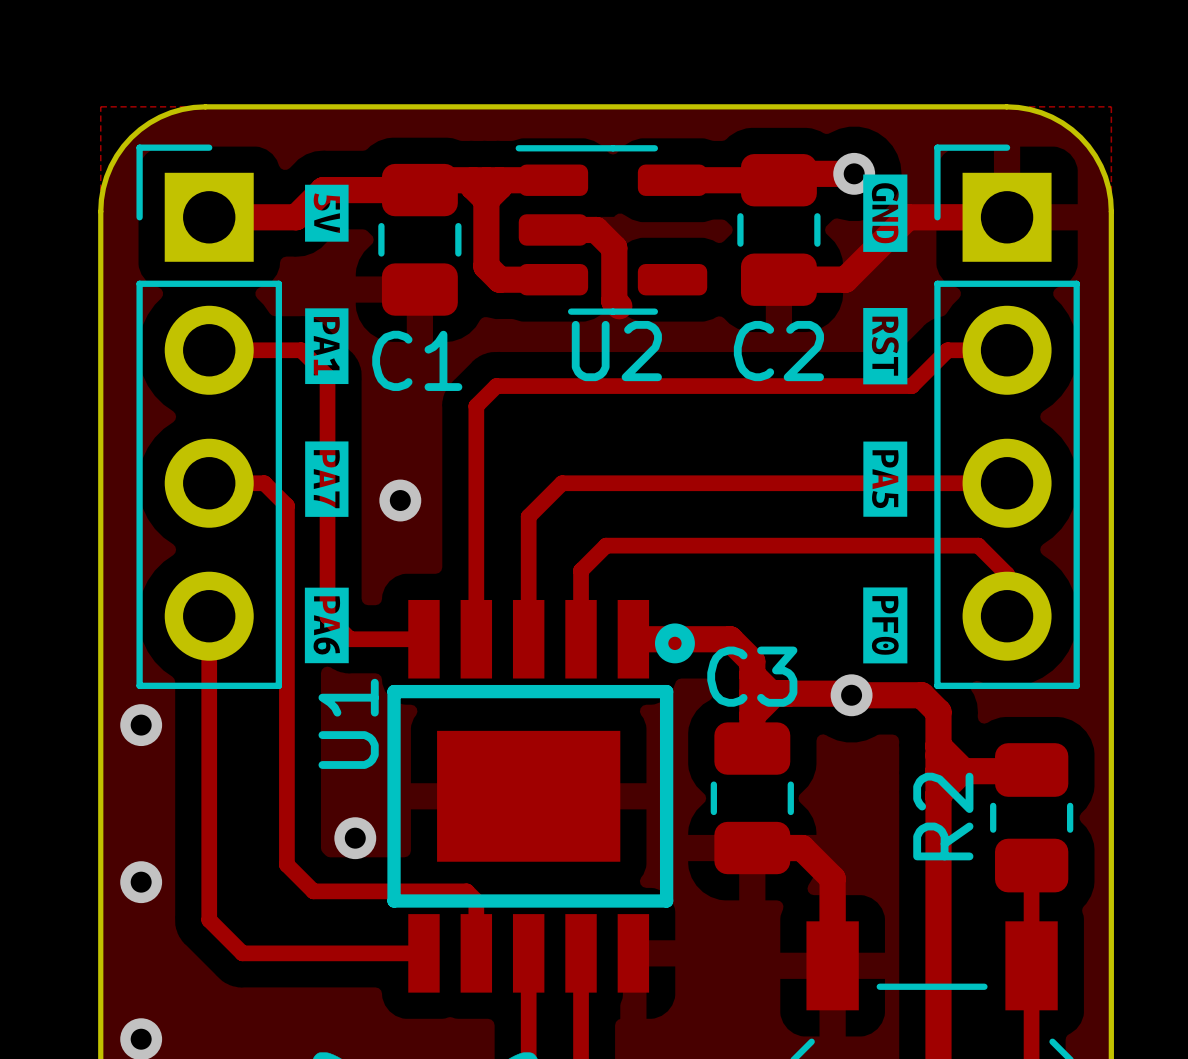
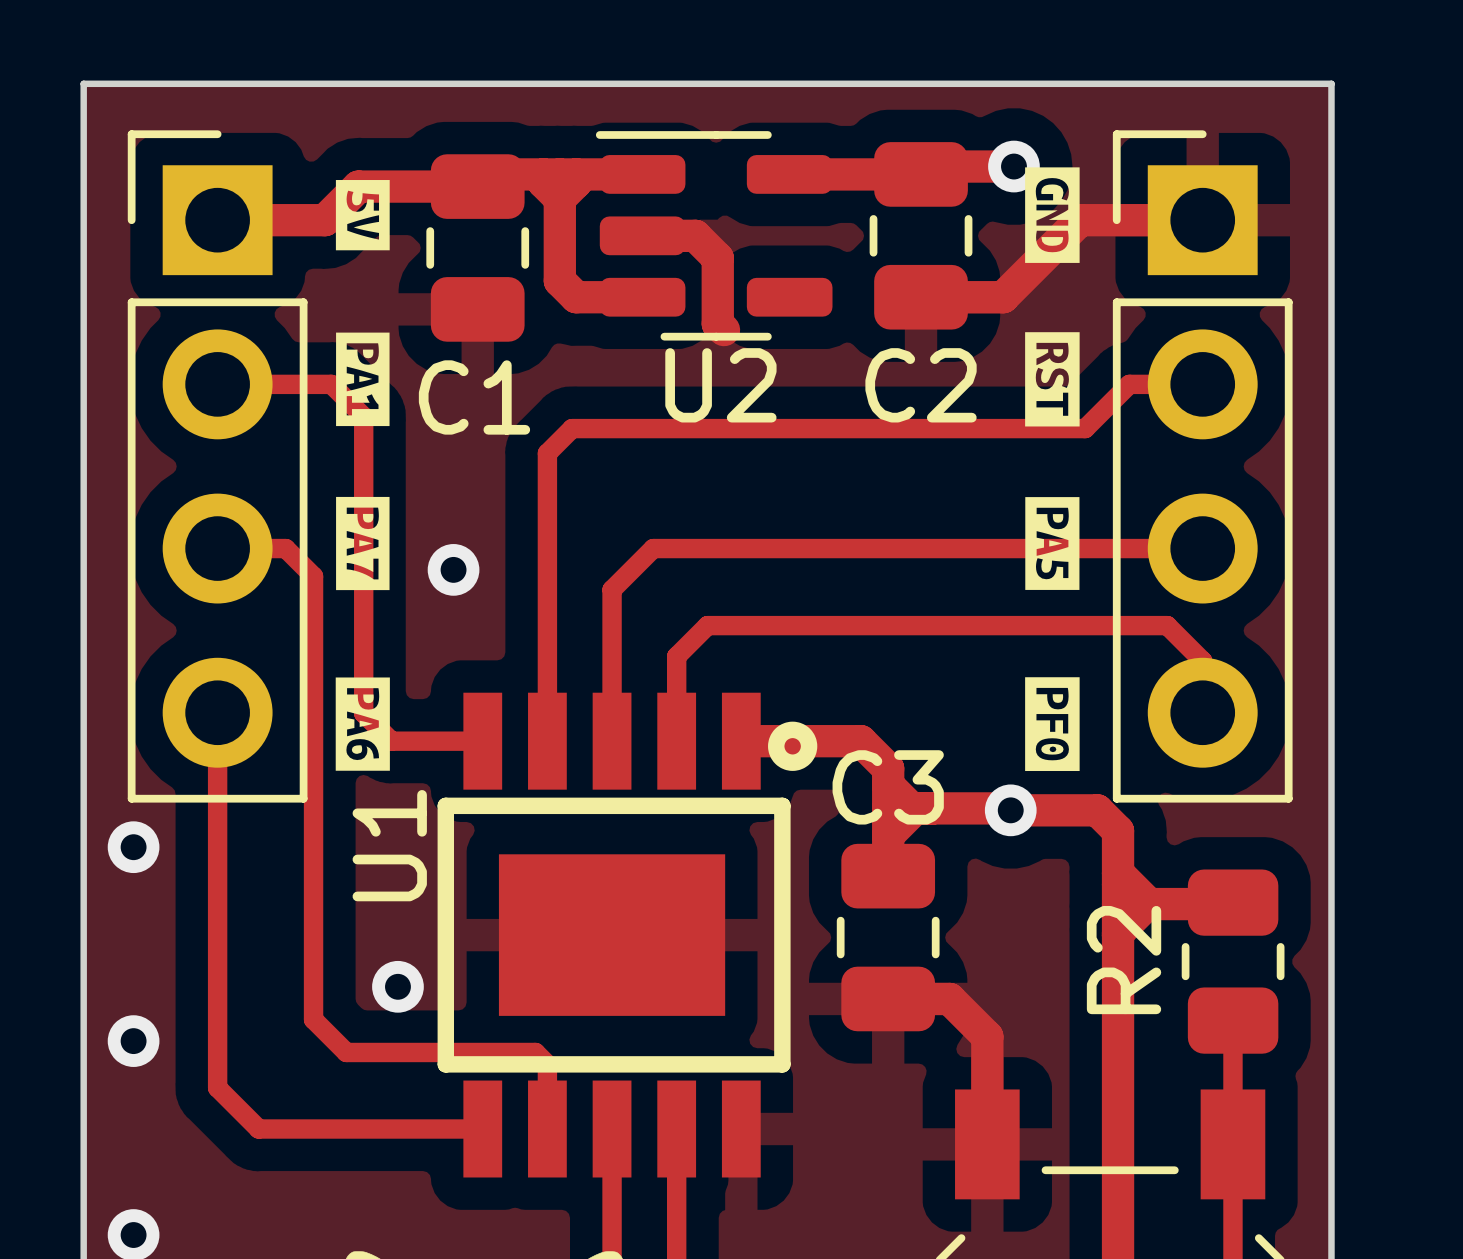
board edge: (205, 106) (182, 109) (160, 117) (131, 137) (116, 155) (106, 176) (100, 211) -> (212, 83) (83, 83) (83, 213)
board edge: (1006, 106) (1041, 112) (1062, 122) (1080, 137) (1095, 155) (1105, 176) (1111, 211) -> (1202, 83) (1331, 83) (1331, 213)

